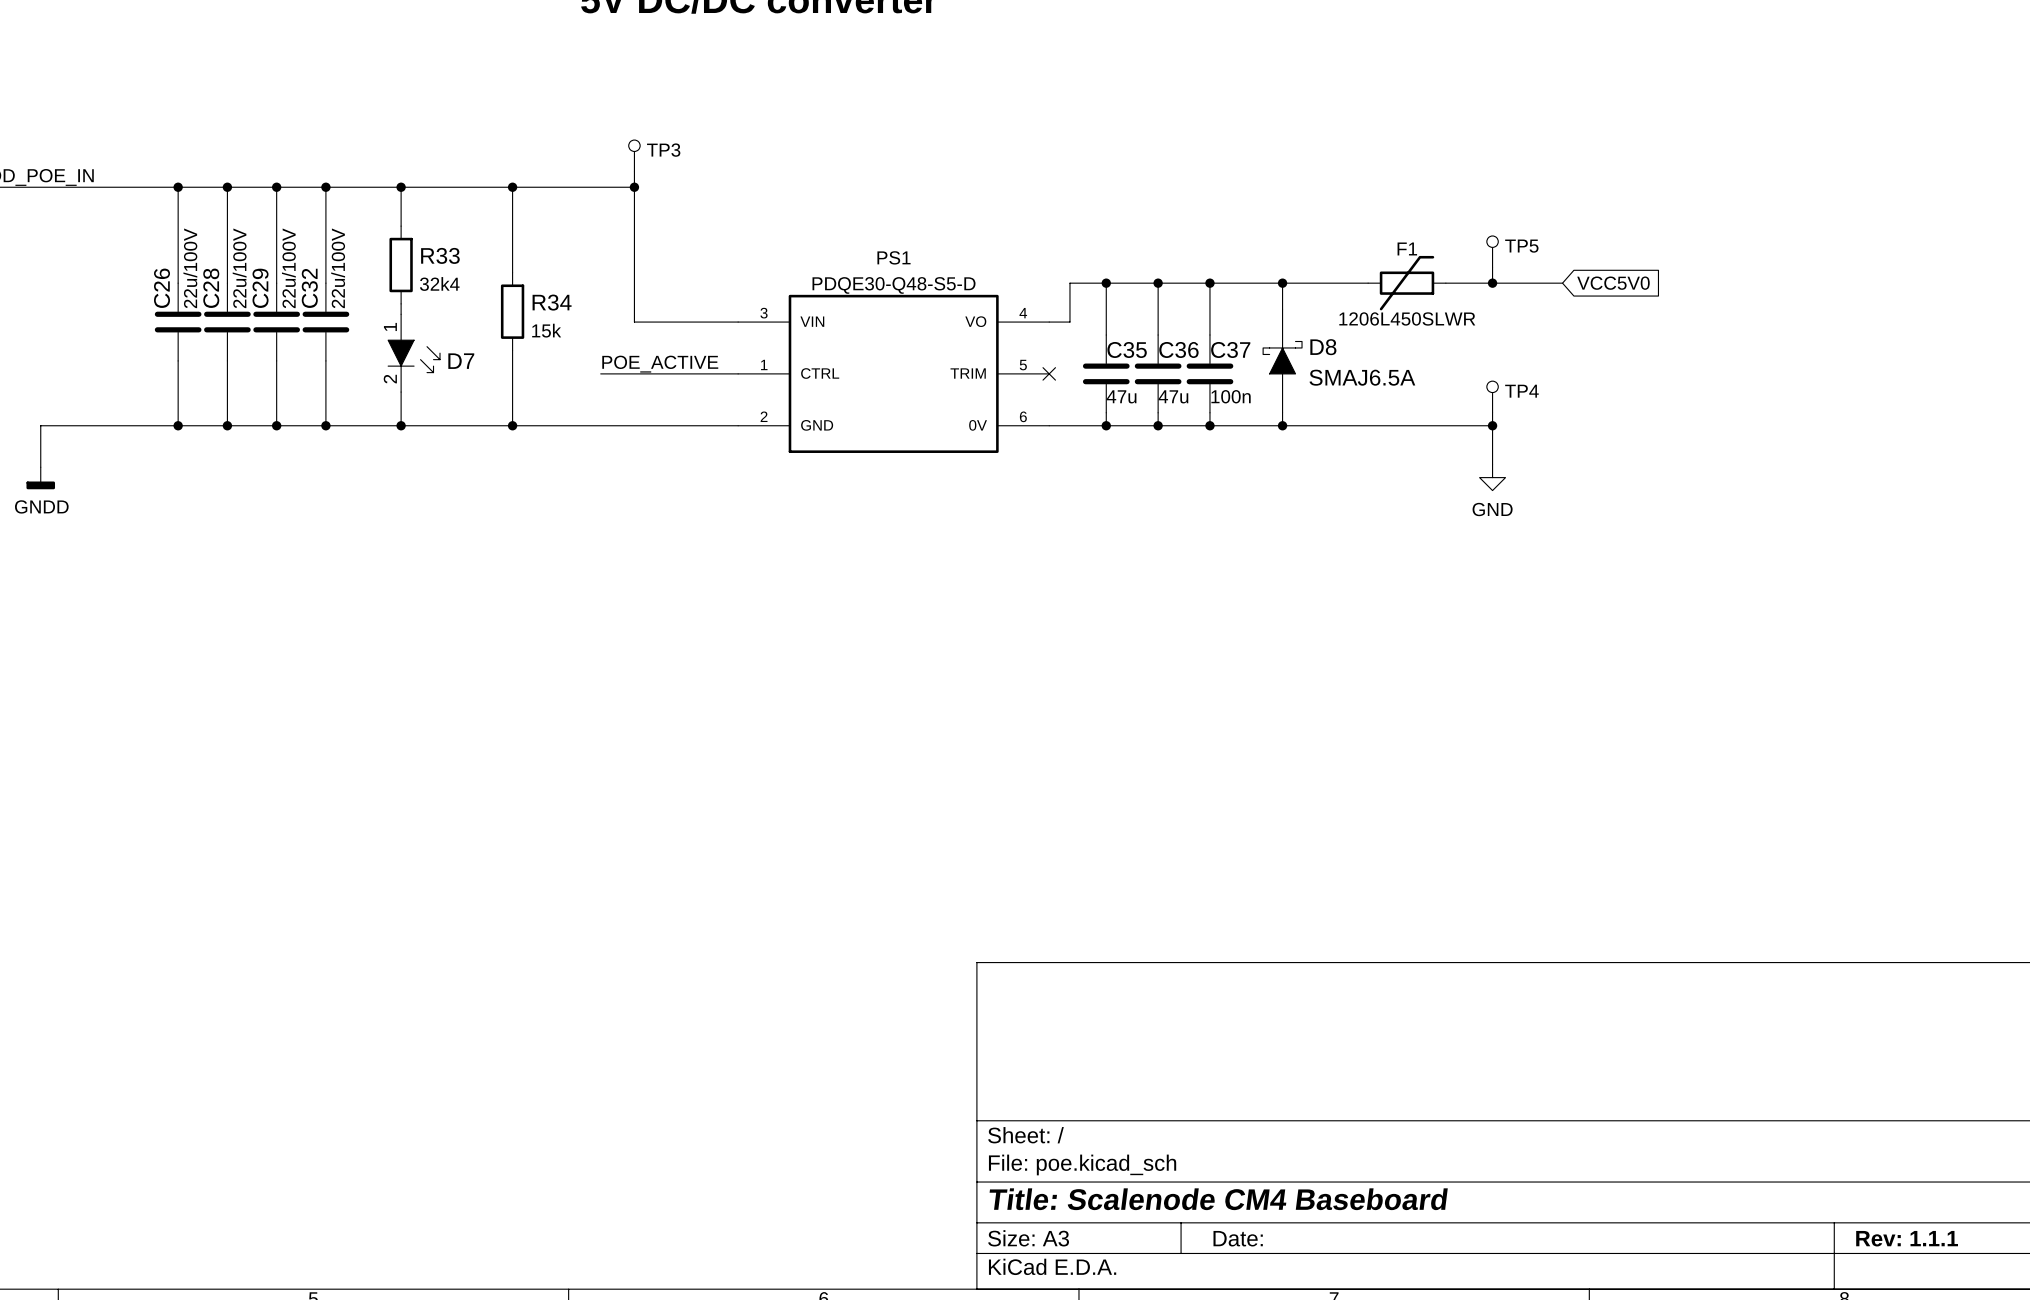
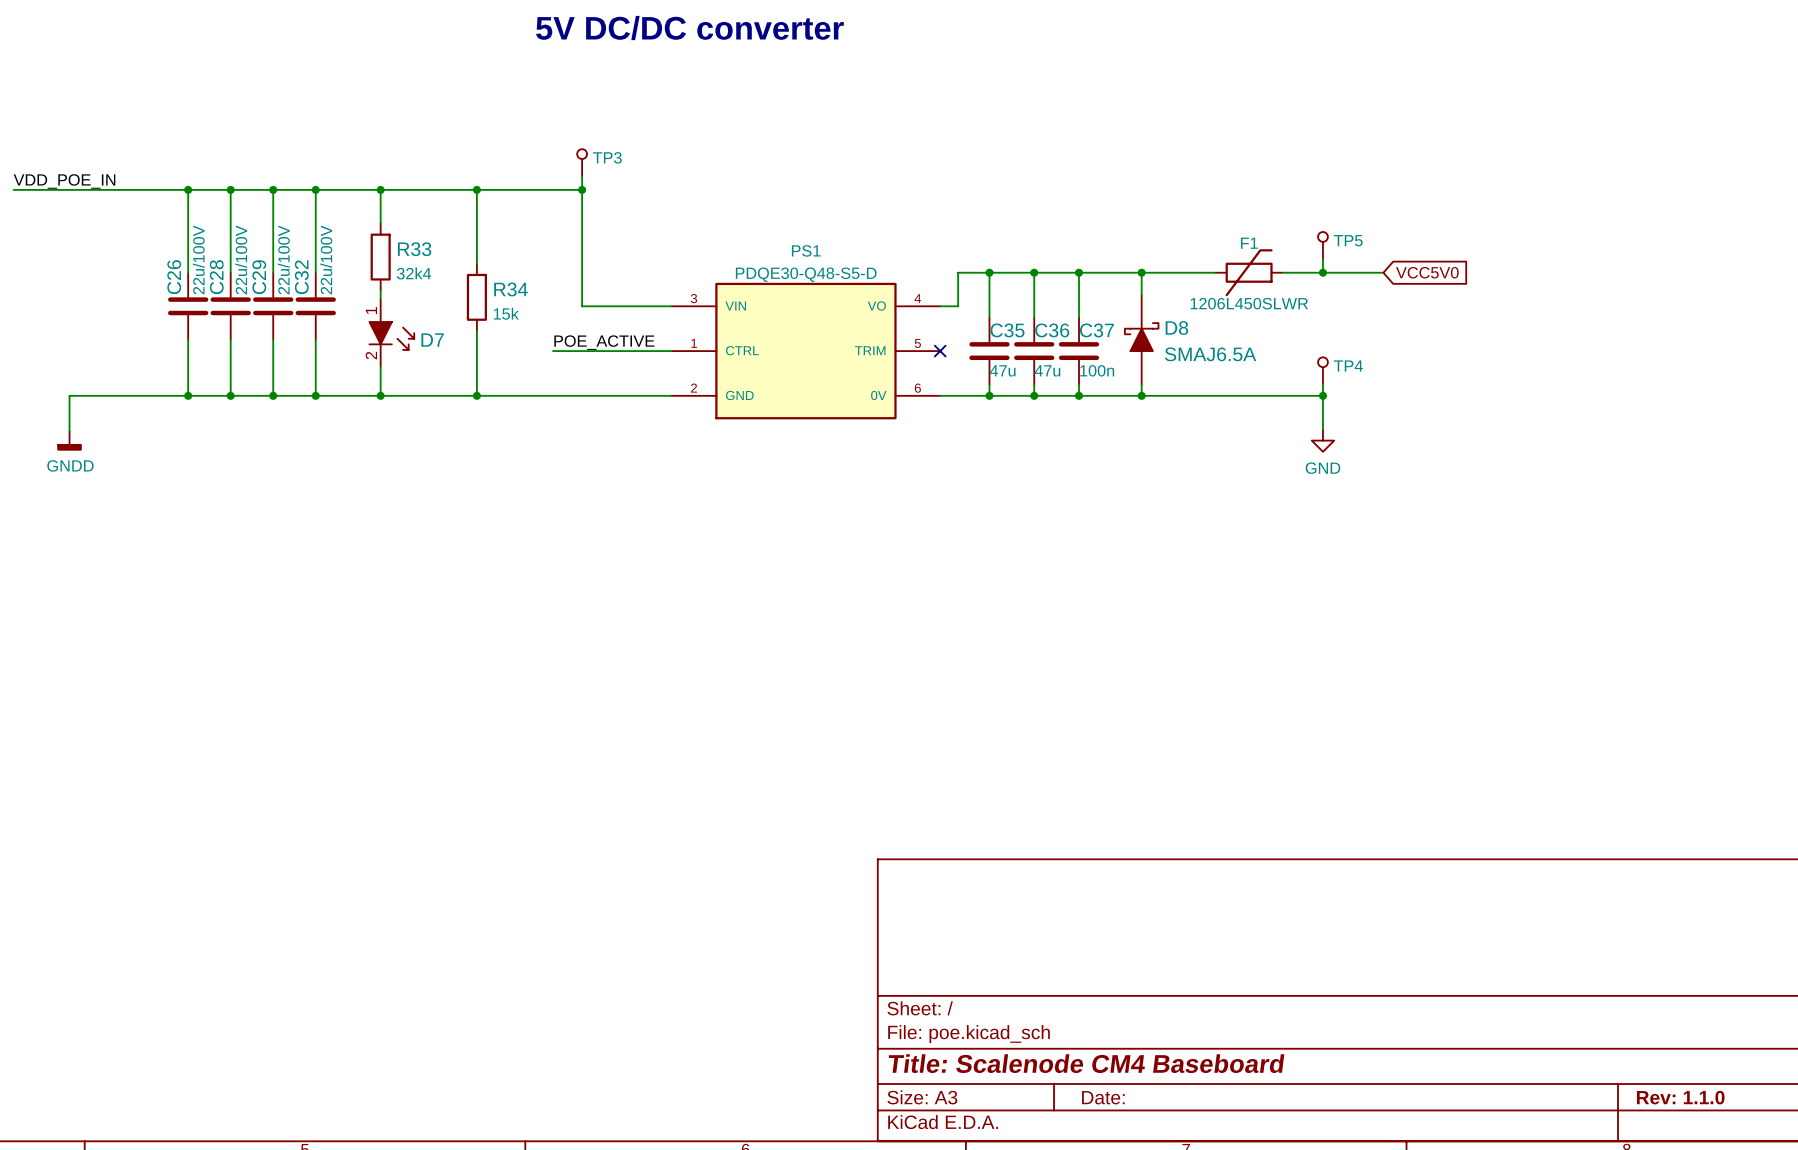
title block: Rev: 1.1.1 (1907, 1238) -> Rev: 1.1.0 (1680, 1097)

